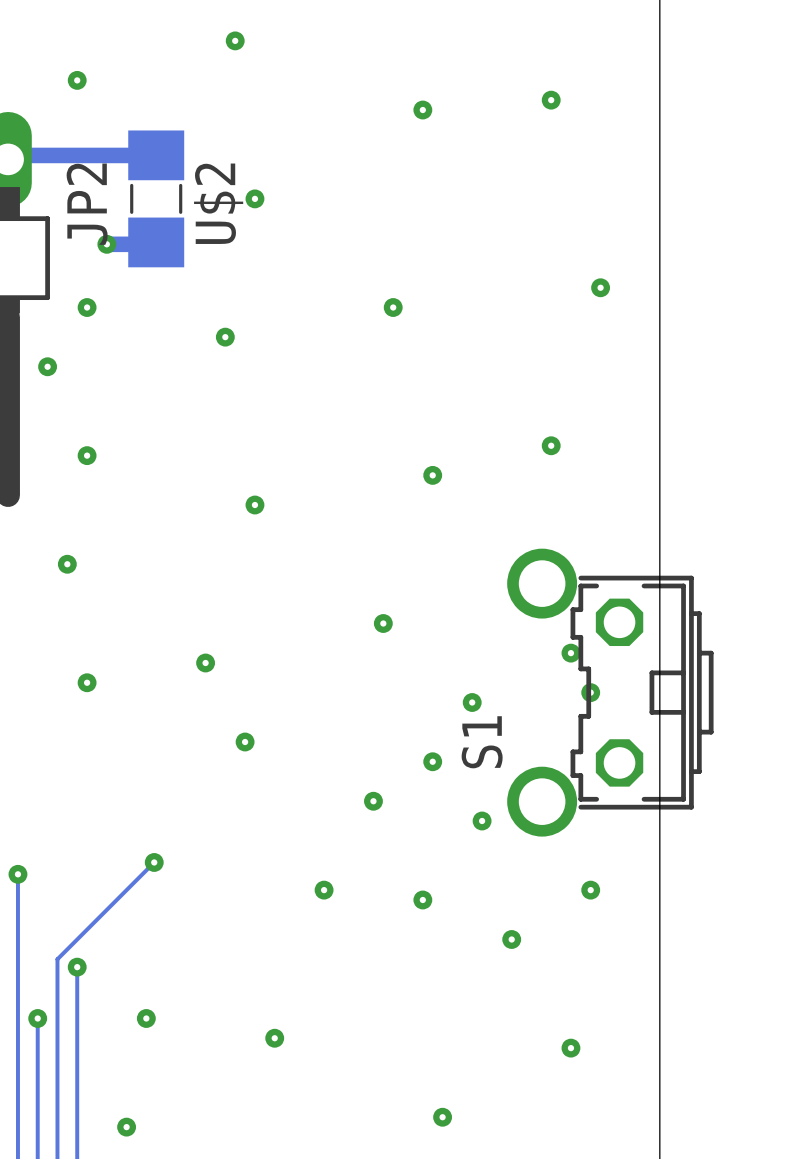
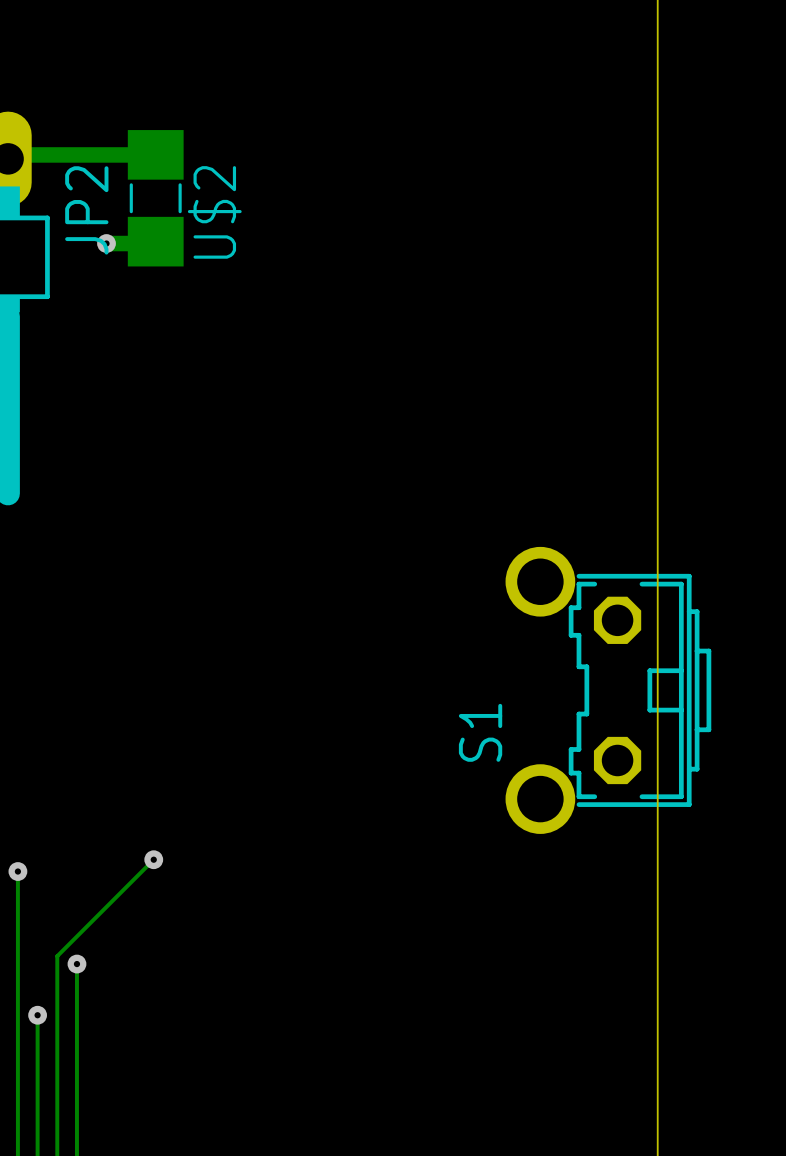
via: (235, 40) -> none
via: (77, 80) -> none
via: (551, 100) -> none
via: (422, 110) -> none
via: (254, 198) -> none
via: (600, 287) -> none
via: (87, 307) -> none
via: (393, 307) -> none
via: (225, 337) -> none
via: (47, 366) -> none
via: (551, 445) -> none
via: (87, 455) -> none
via: (432, 475) -> none
via: (254, 505) -> none
via: (67, 564) -> none
via: (383, 623) -> none
via: (570, 653) -> none
via: (205, 663) -> none
via: (87, 682) -> none
via: (590, 692) -> none
via: (472, 702) -> none
via: (245, 742) -> none
via: (432, 761) -> none
via: (373, 801) -> none
via: (482, 821) -> none
via: (324, 890) -> none
via: (590, 890) -> none
via: (422, 899) -> none
via: (511, 939) -> none
via: (146, 1018) -> none
via: (274, 1038) -> none
via: (570, 1048) -> none
via: (442, 1117) -> none
via: (126, 1127) -> none

